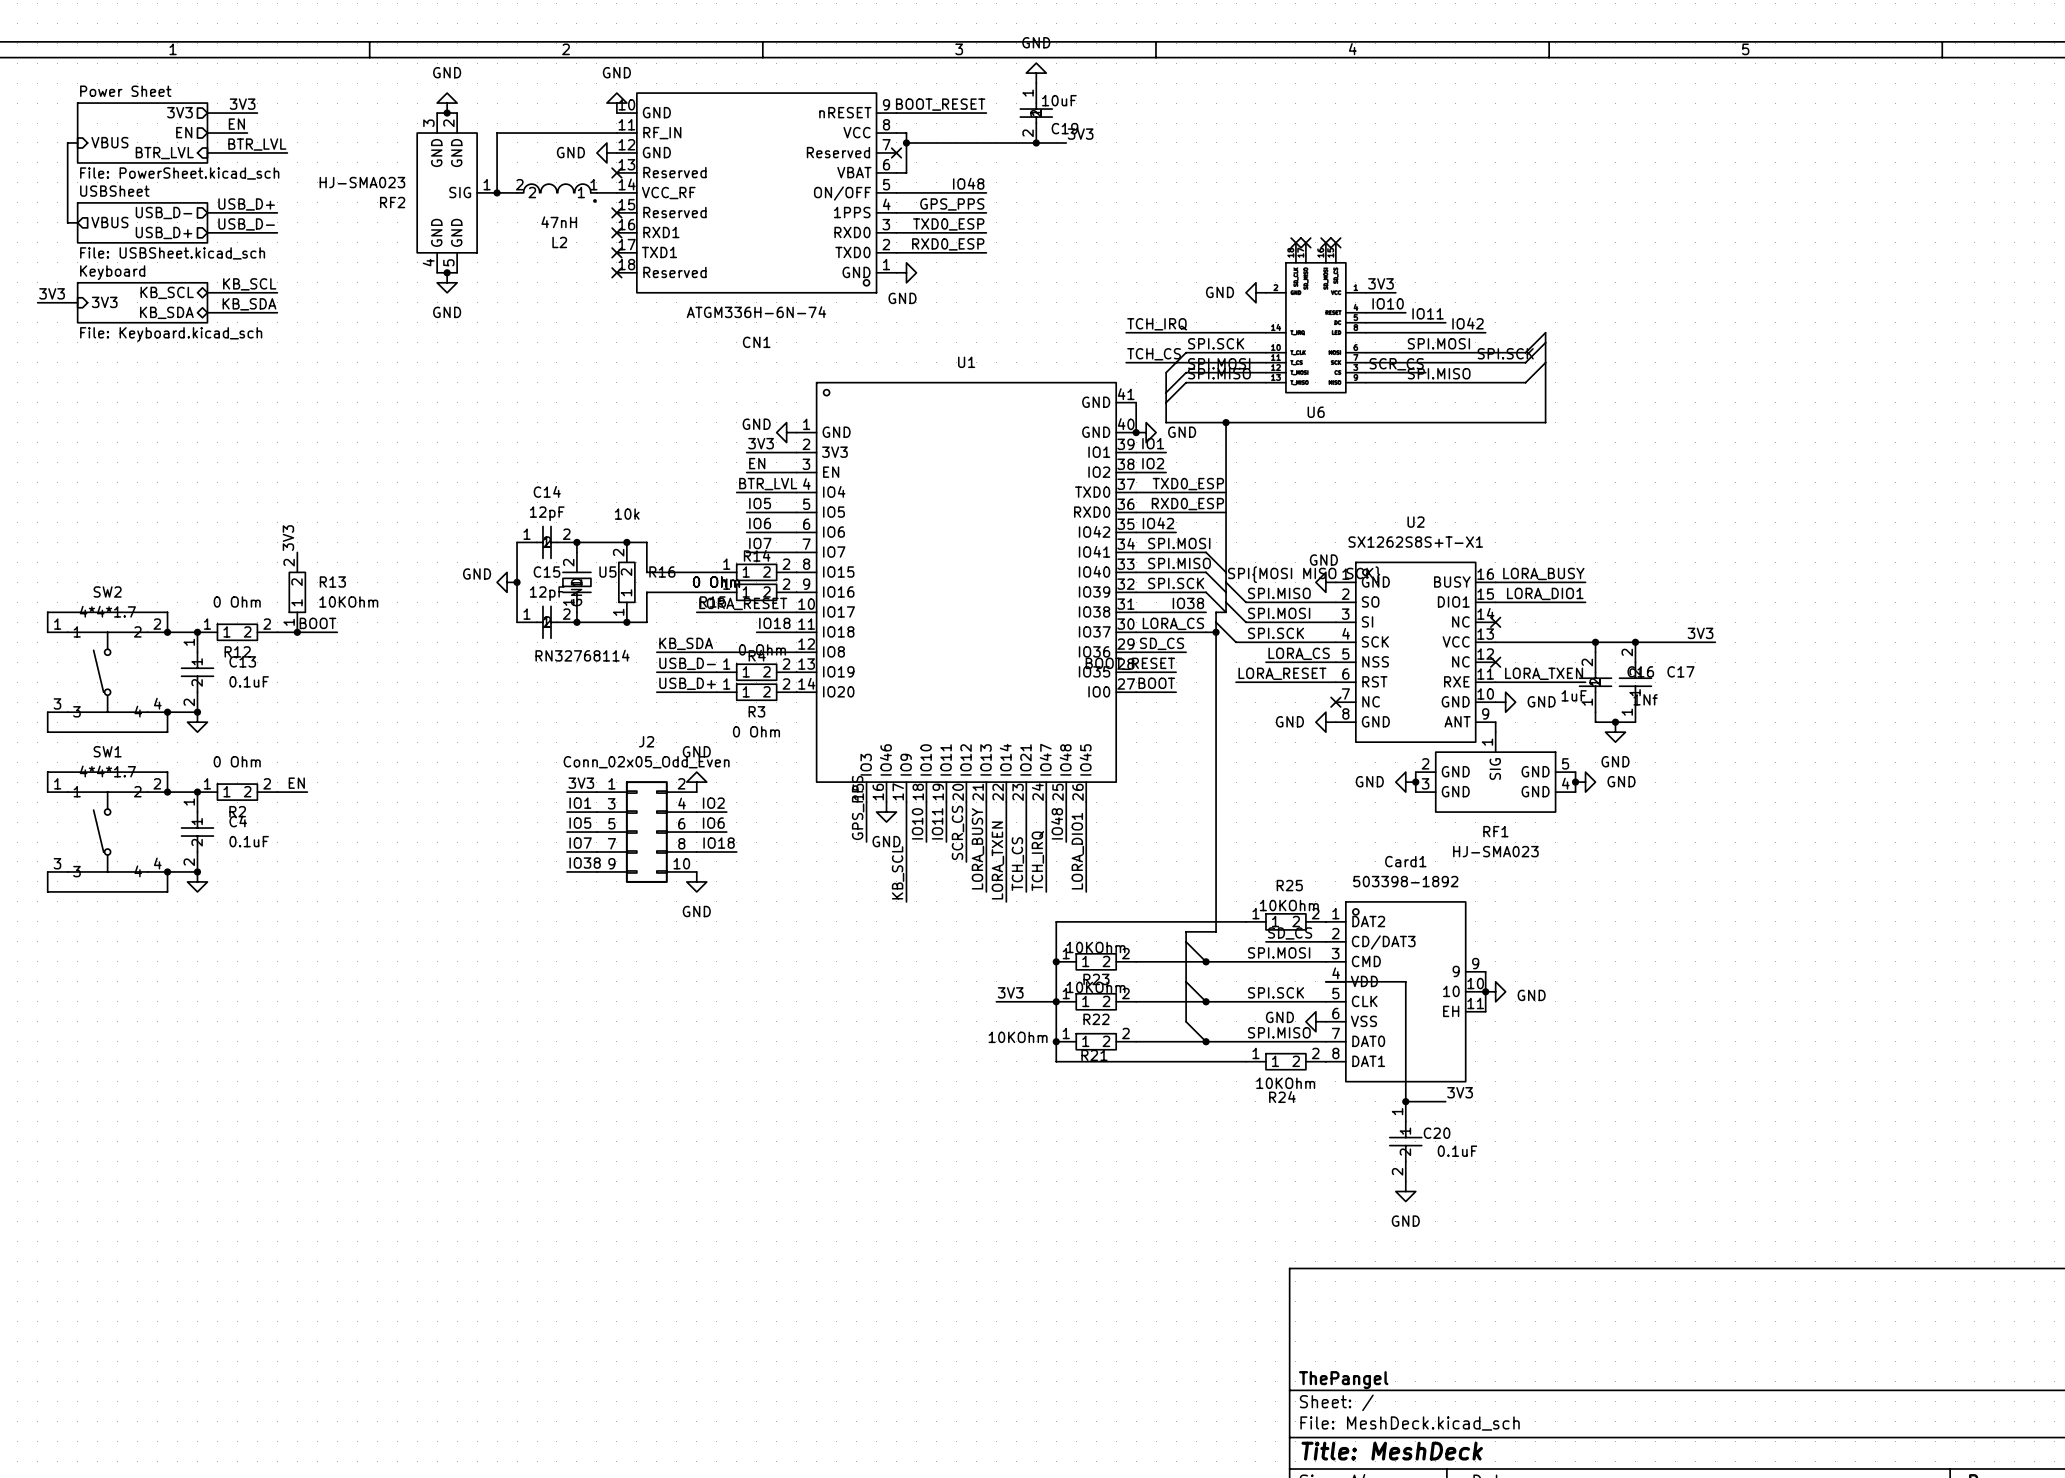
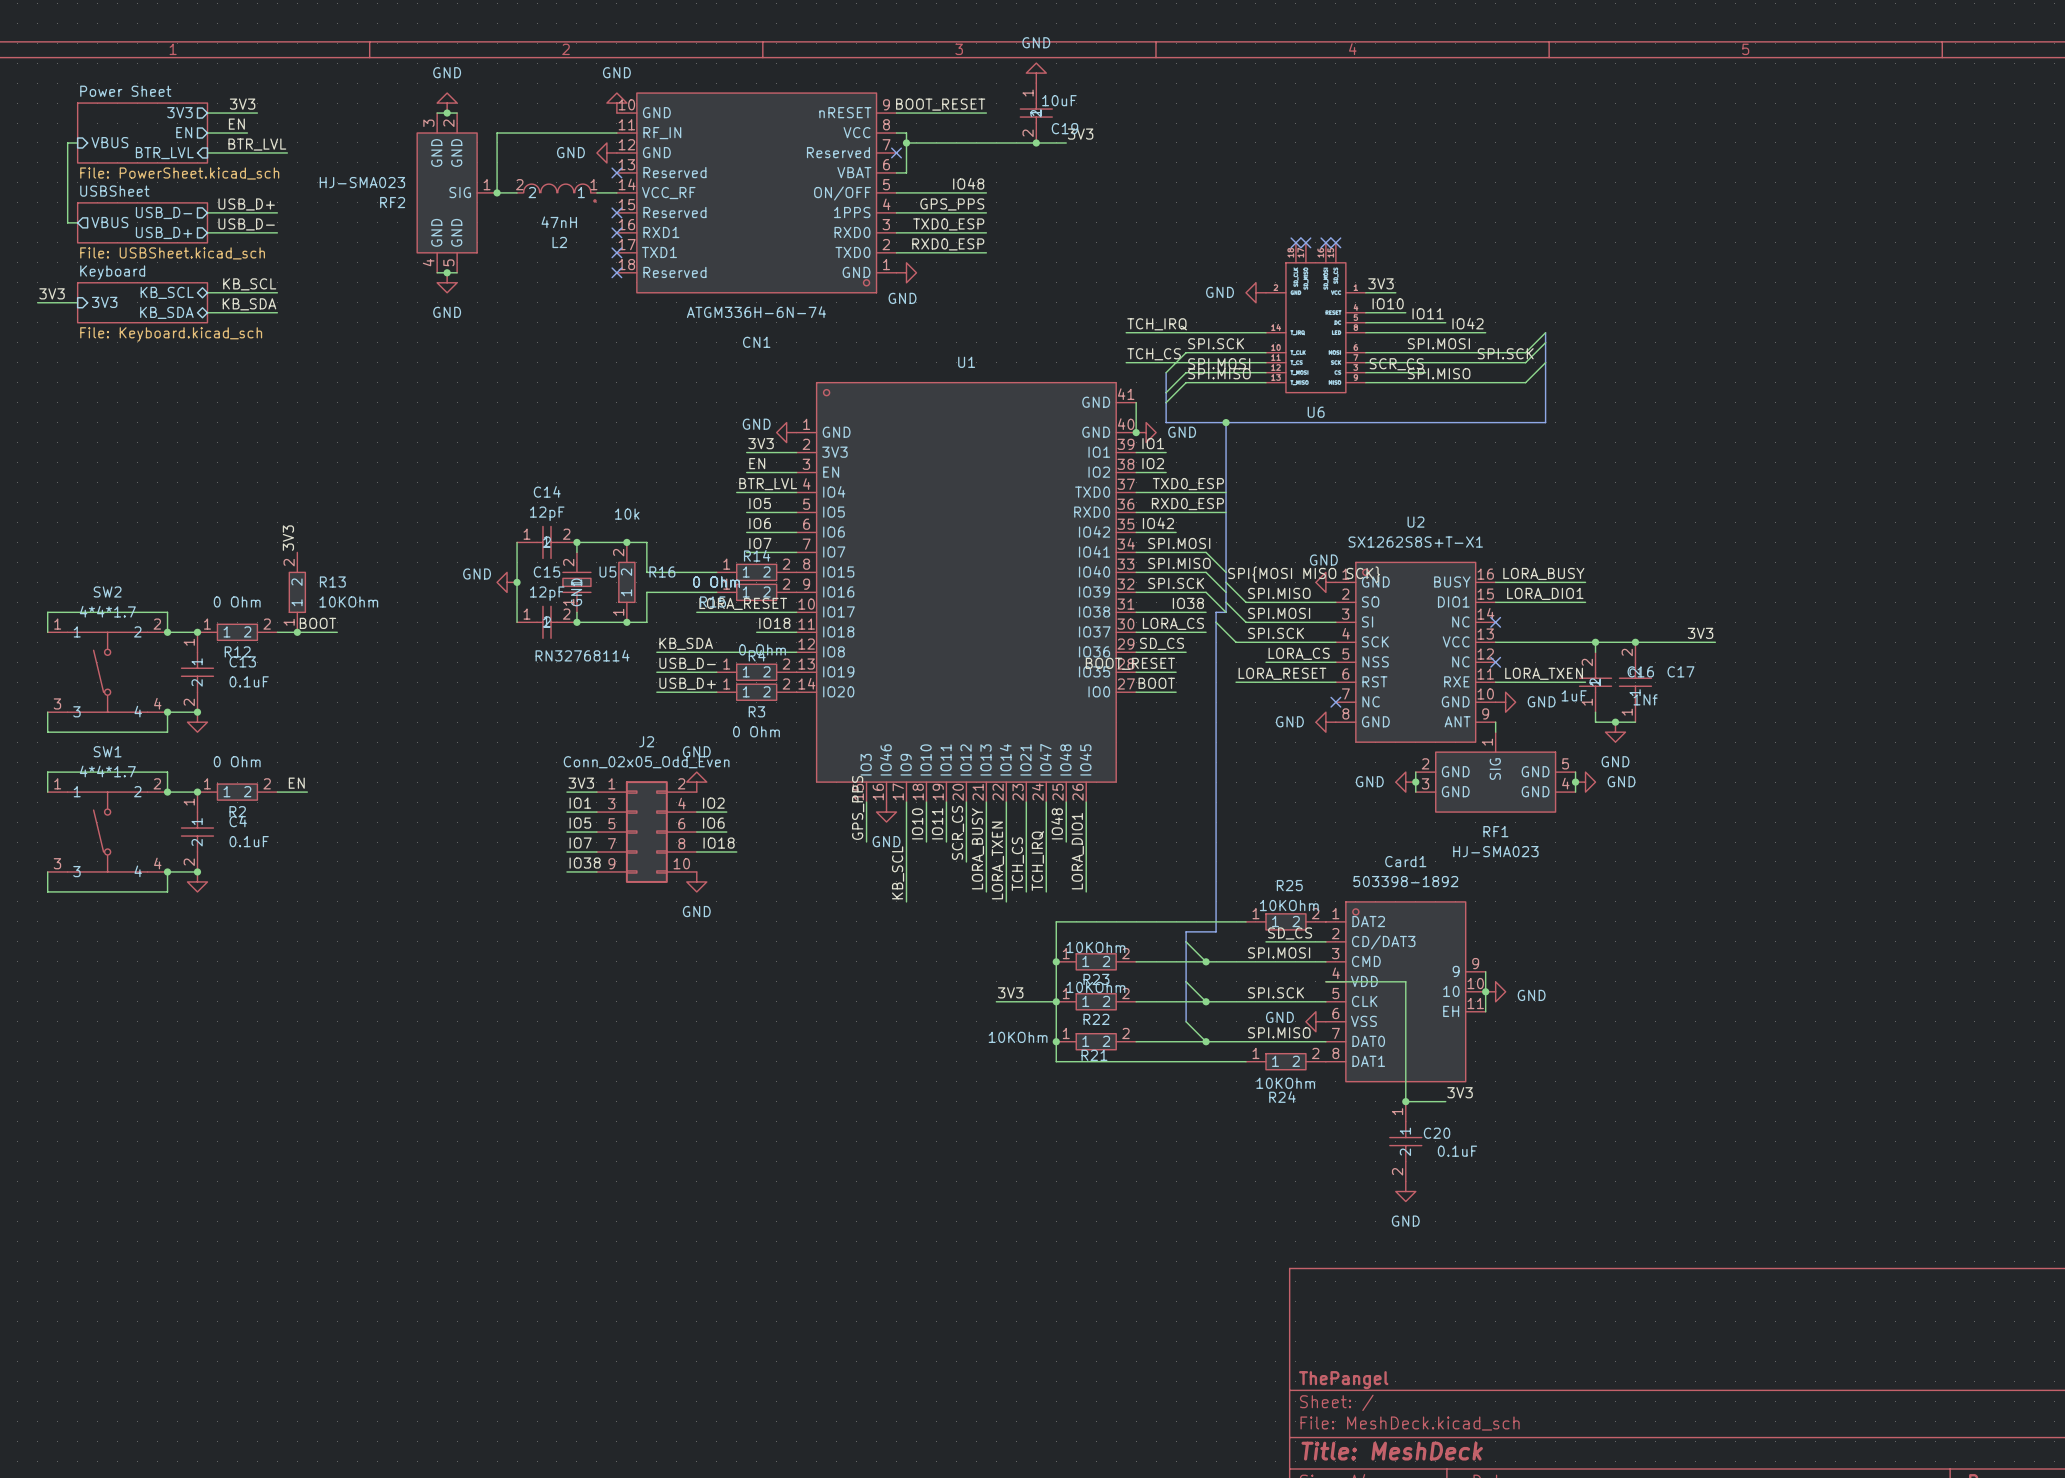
bus: (1206, 632) (1216, 632) -> none
junction: (1216, 632) -> none

